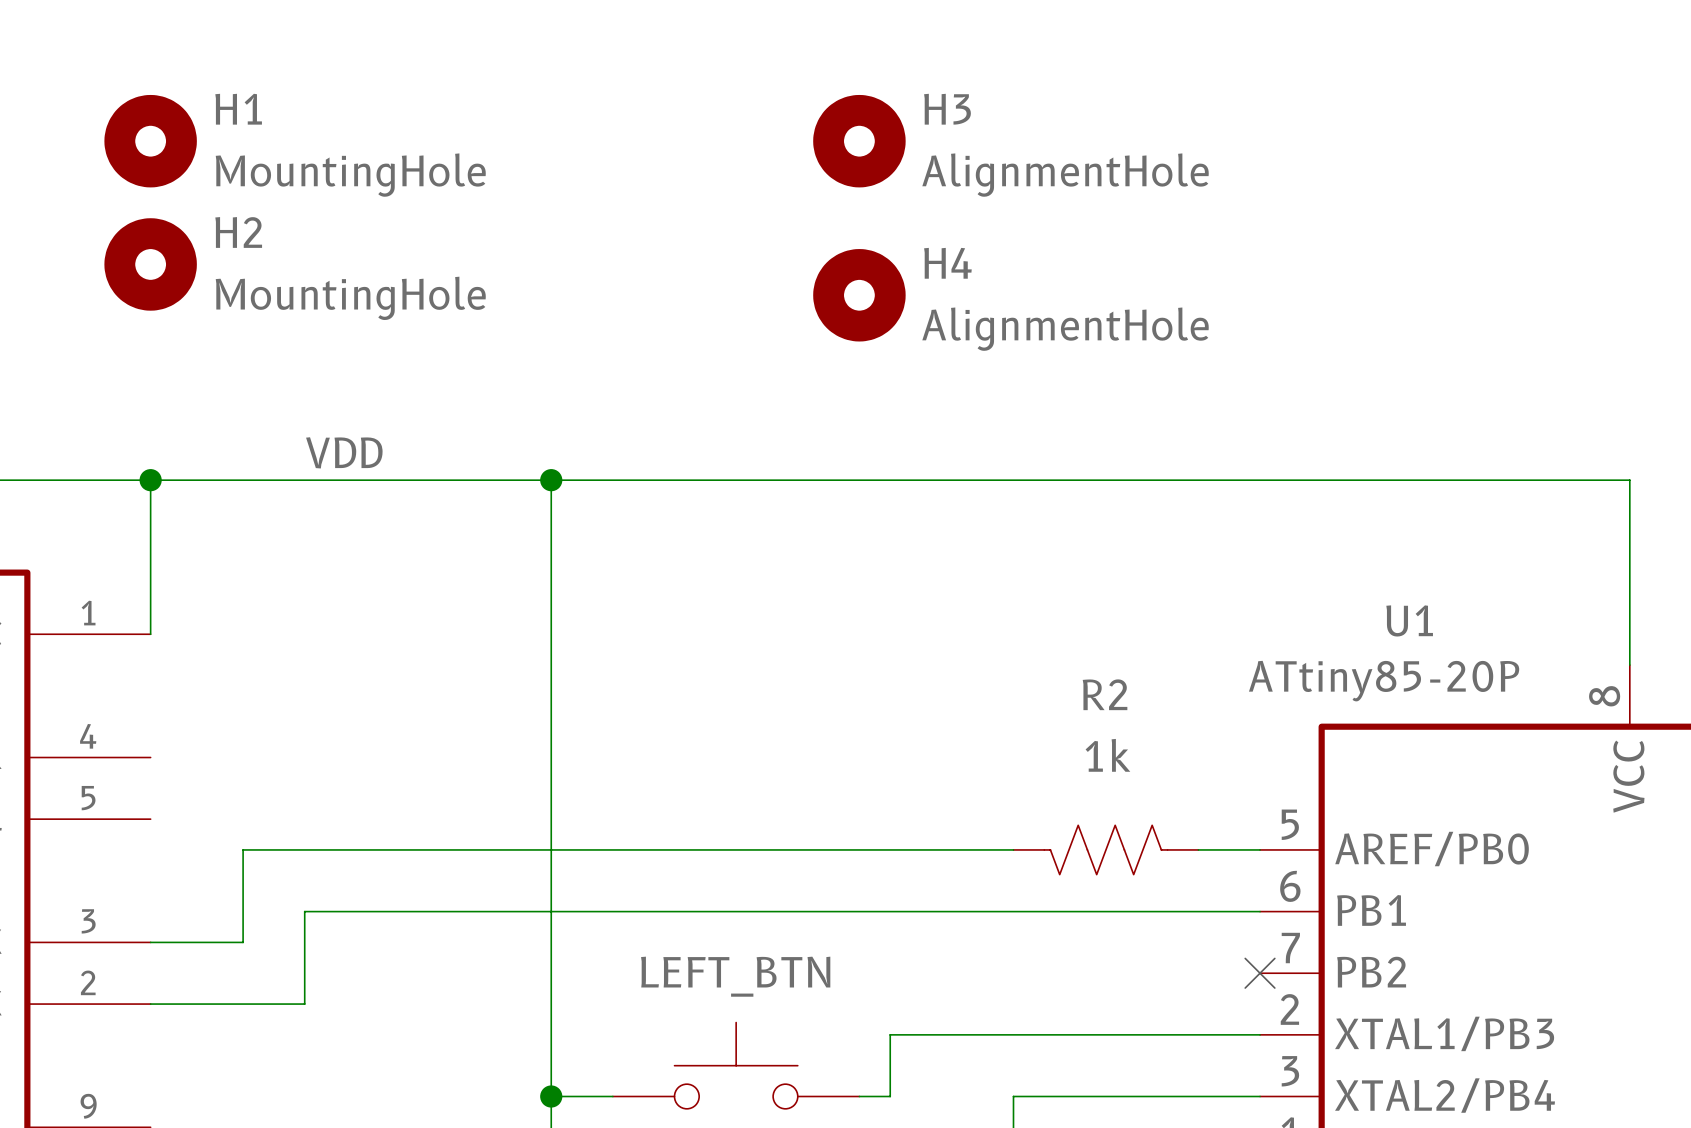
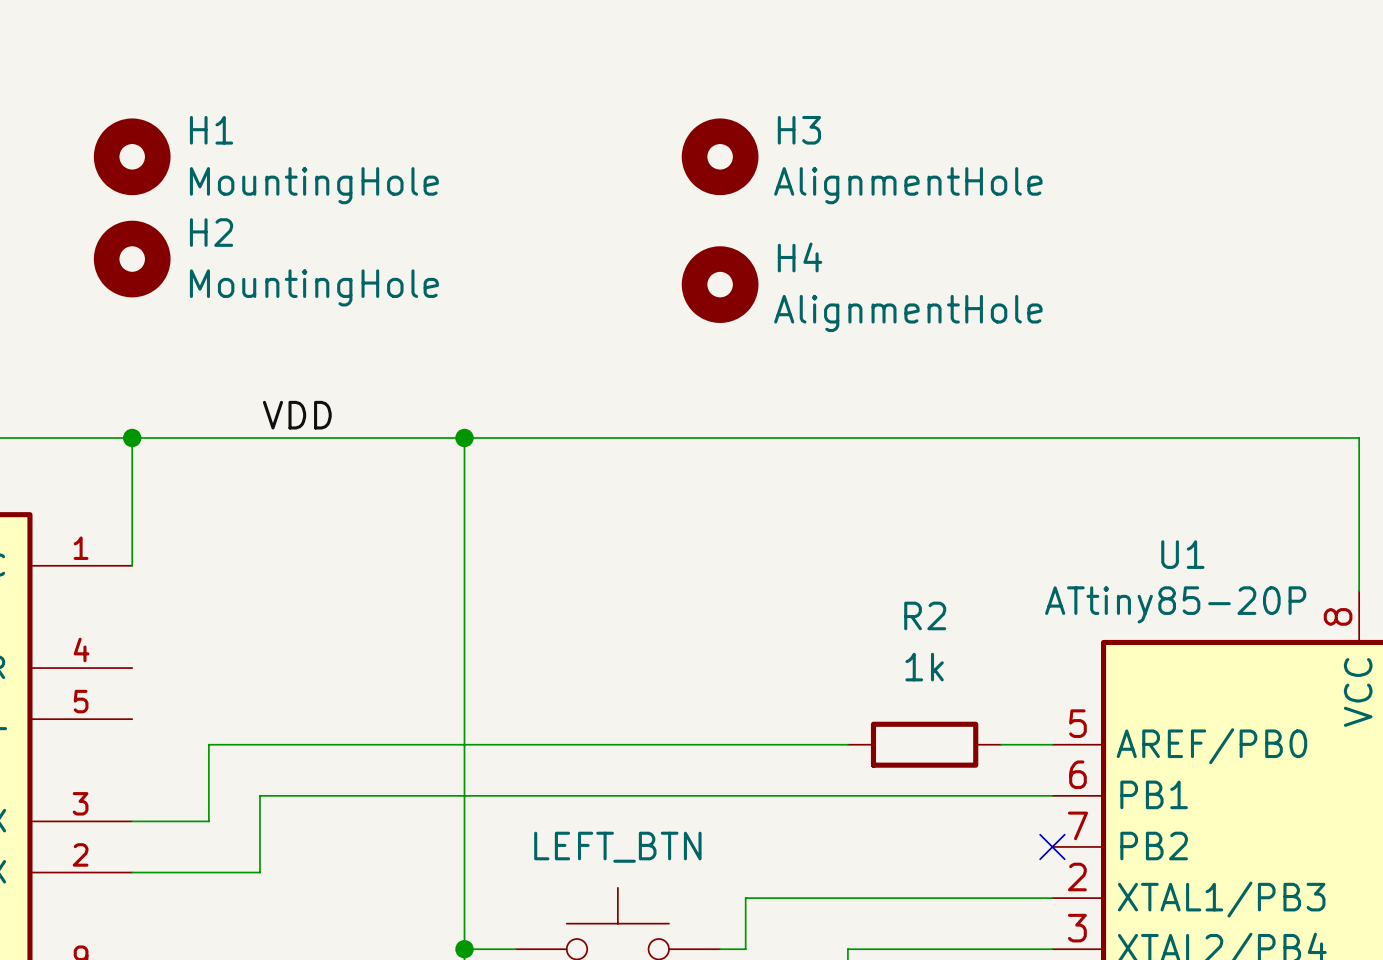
R2 symbol: [1013, 825, 1199, 875] -> [847, 721, 1002, 768]

